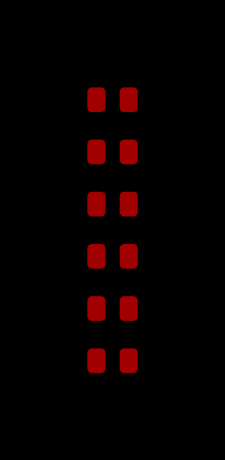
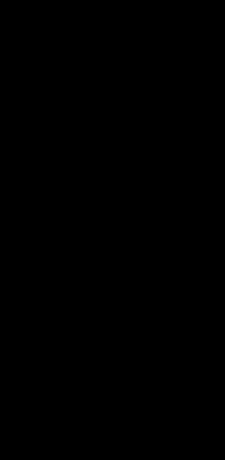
part: (112, 99) -> none
part: (112, 151) -> none
part: (112, 204) -> none
part: (112, 256) -> none
part: (112, 308) -> none
part: (112, 360) -> none

